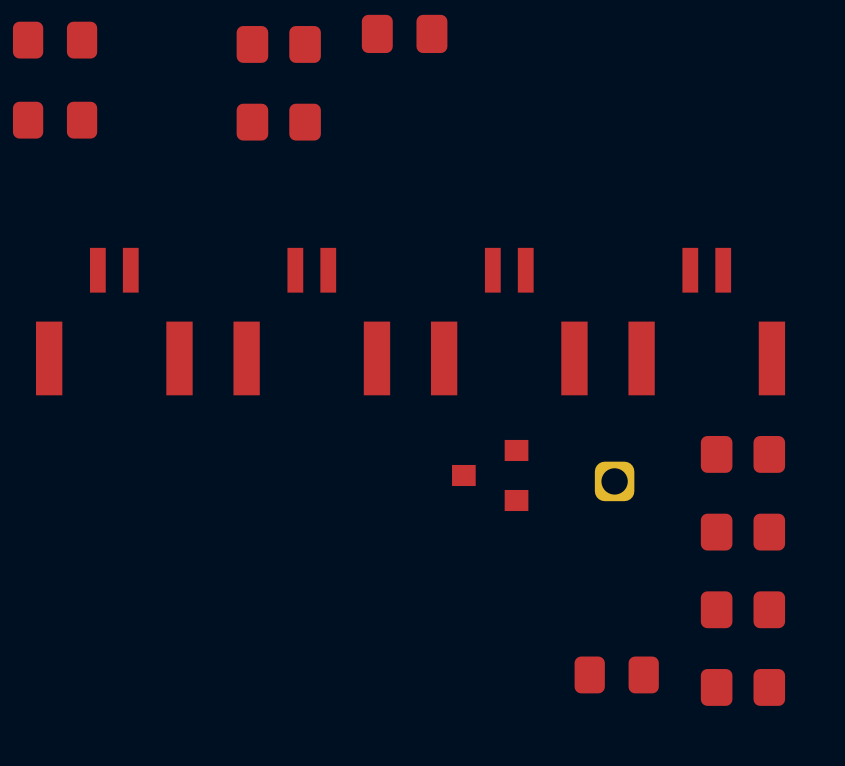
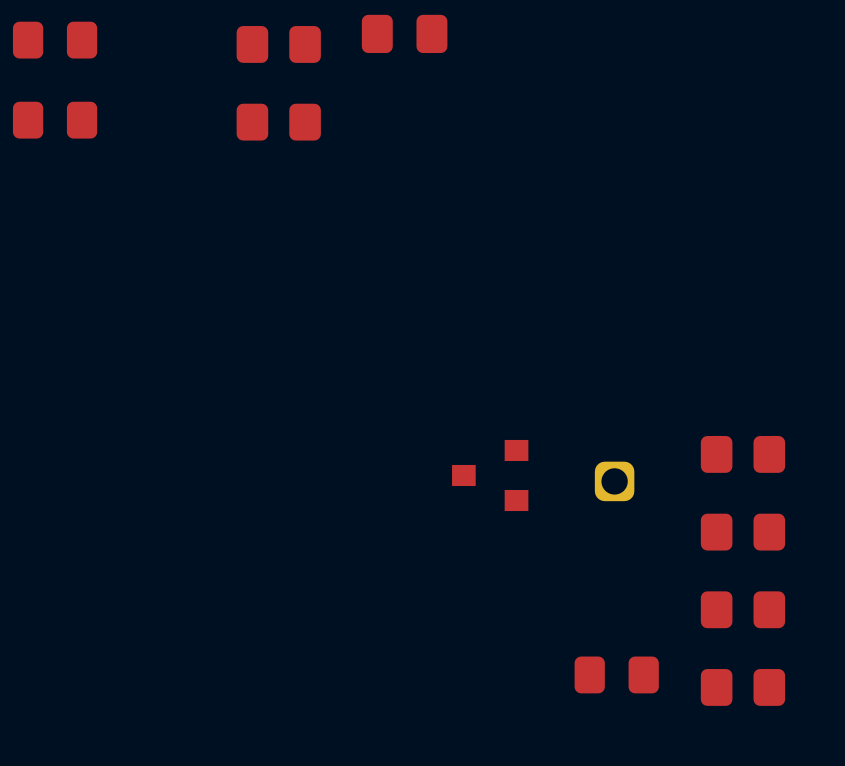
part: (114, 321) -> none
part: (311, 321) -> none
part: (509, 321) -> none
part: (706, 321) -> none

